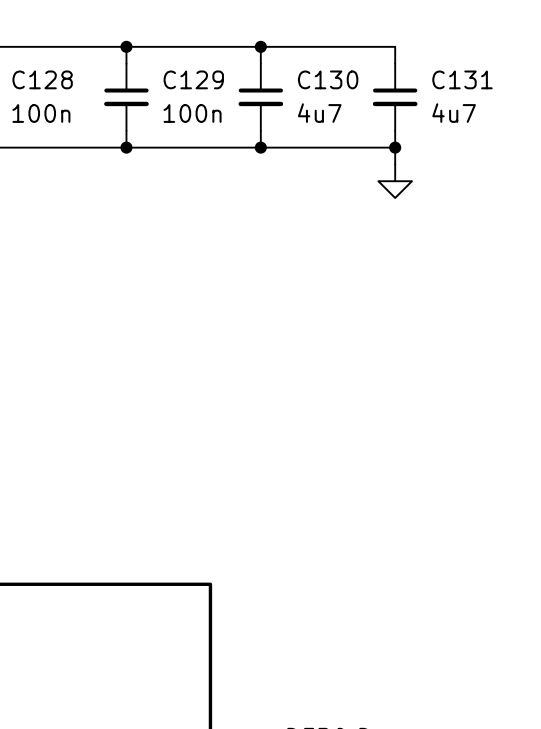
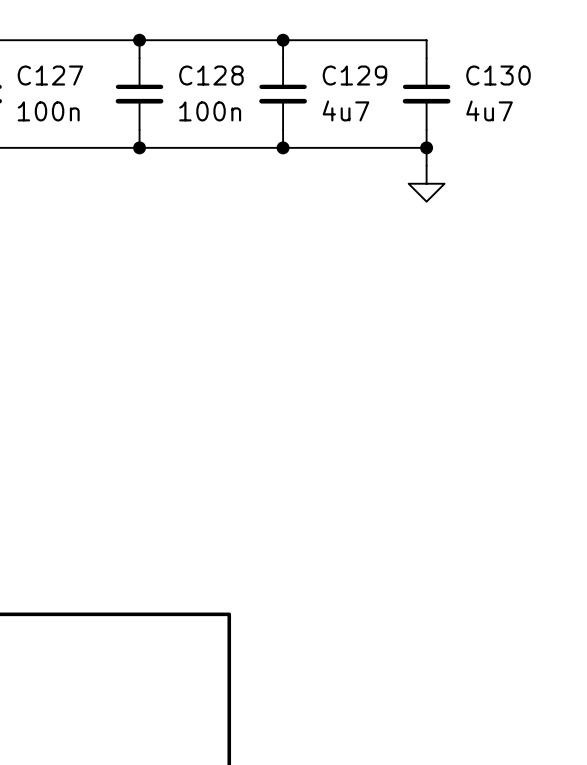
C128 name: C128 (42, 79) -> C127 (50, 75)
C129 name: C129 (193, 79) -> C128 (211, 75)
C130 name: C130 (328, 79) -> C129 (354, 75)
C131 name: C131 (462, 79) -> C130 (498, 75)

